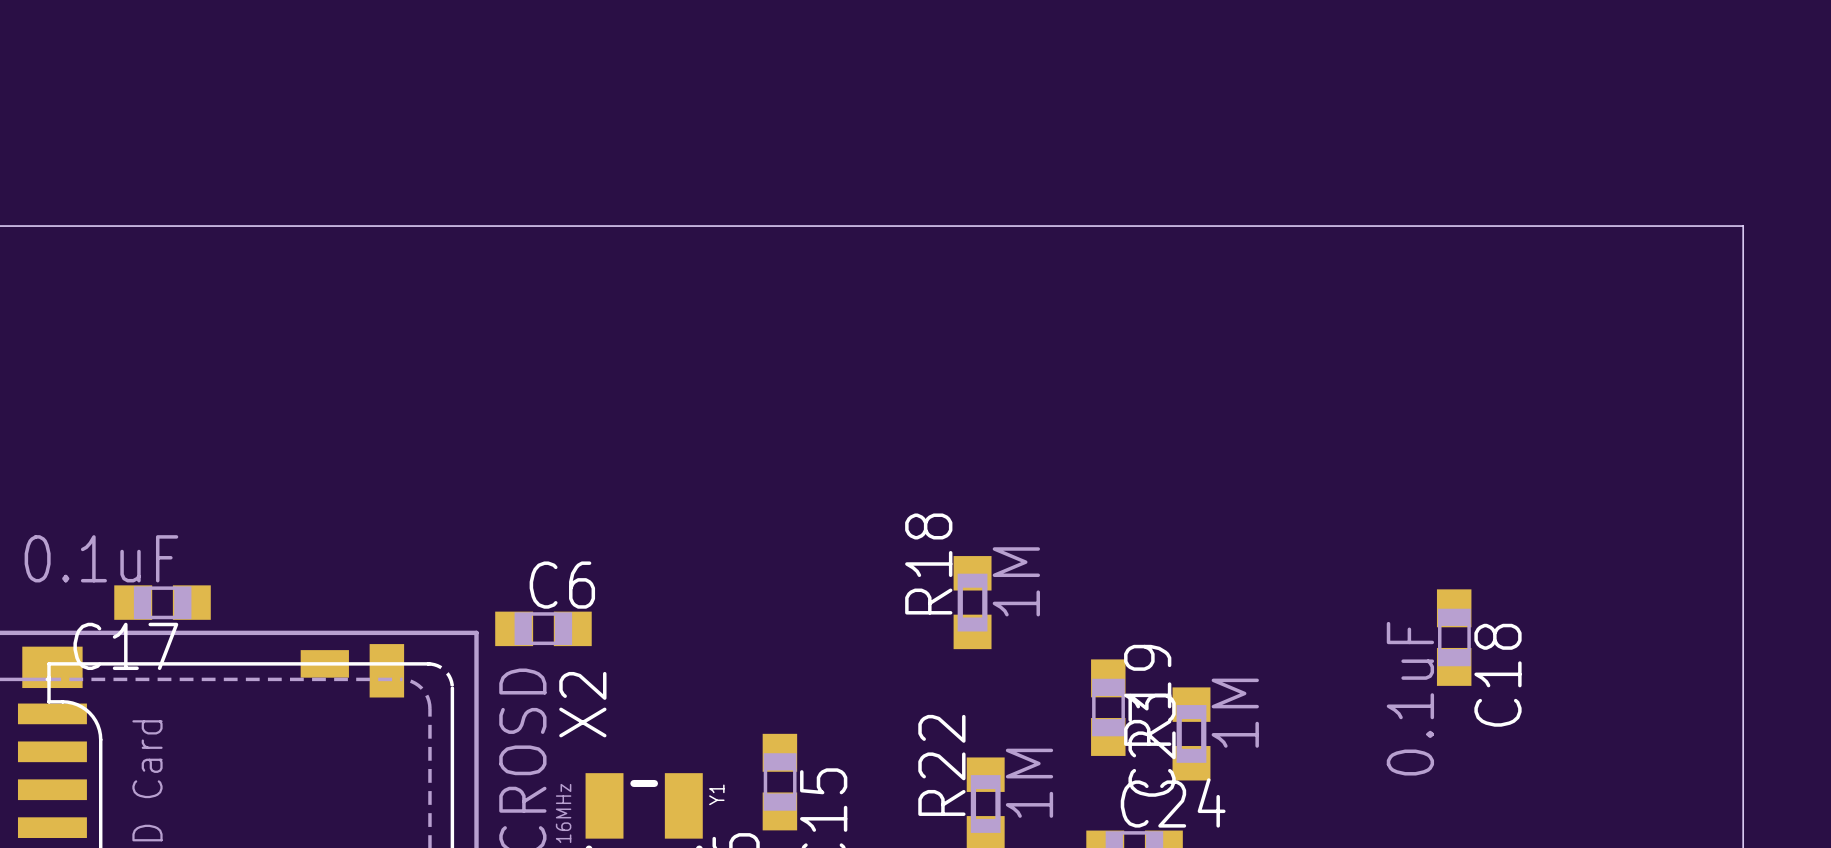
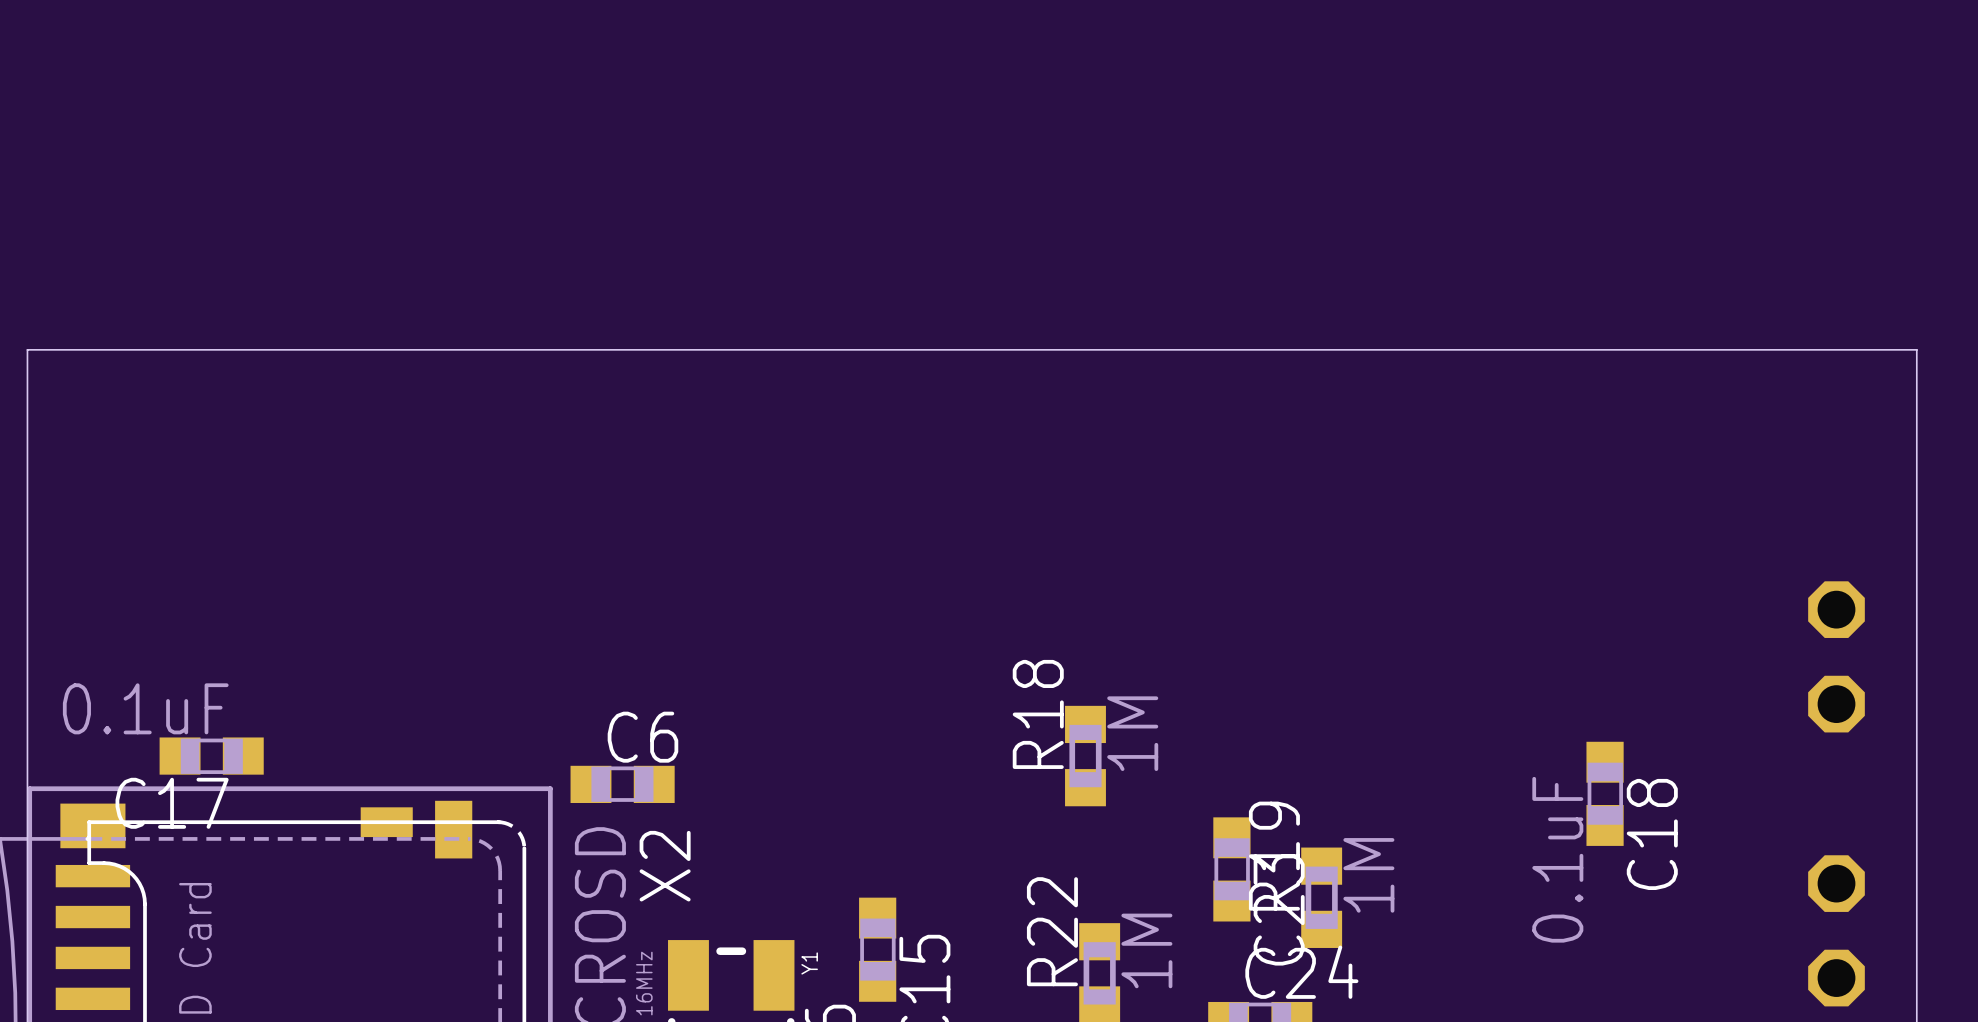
part: none -> (1836, 609)
part: none -> (1836, 704)
part: none -> (1836, 883)
part: none -> (1836, 978)

